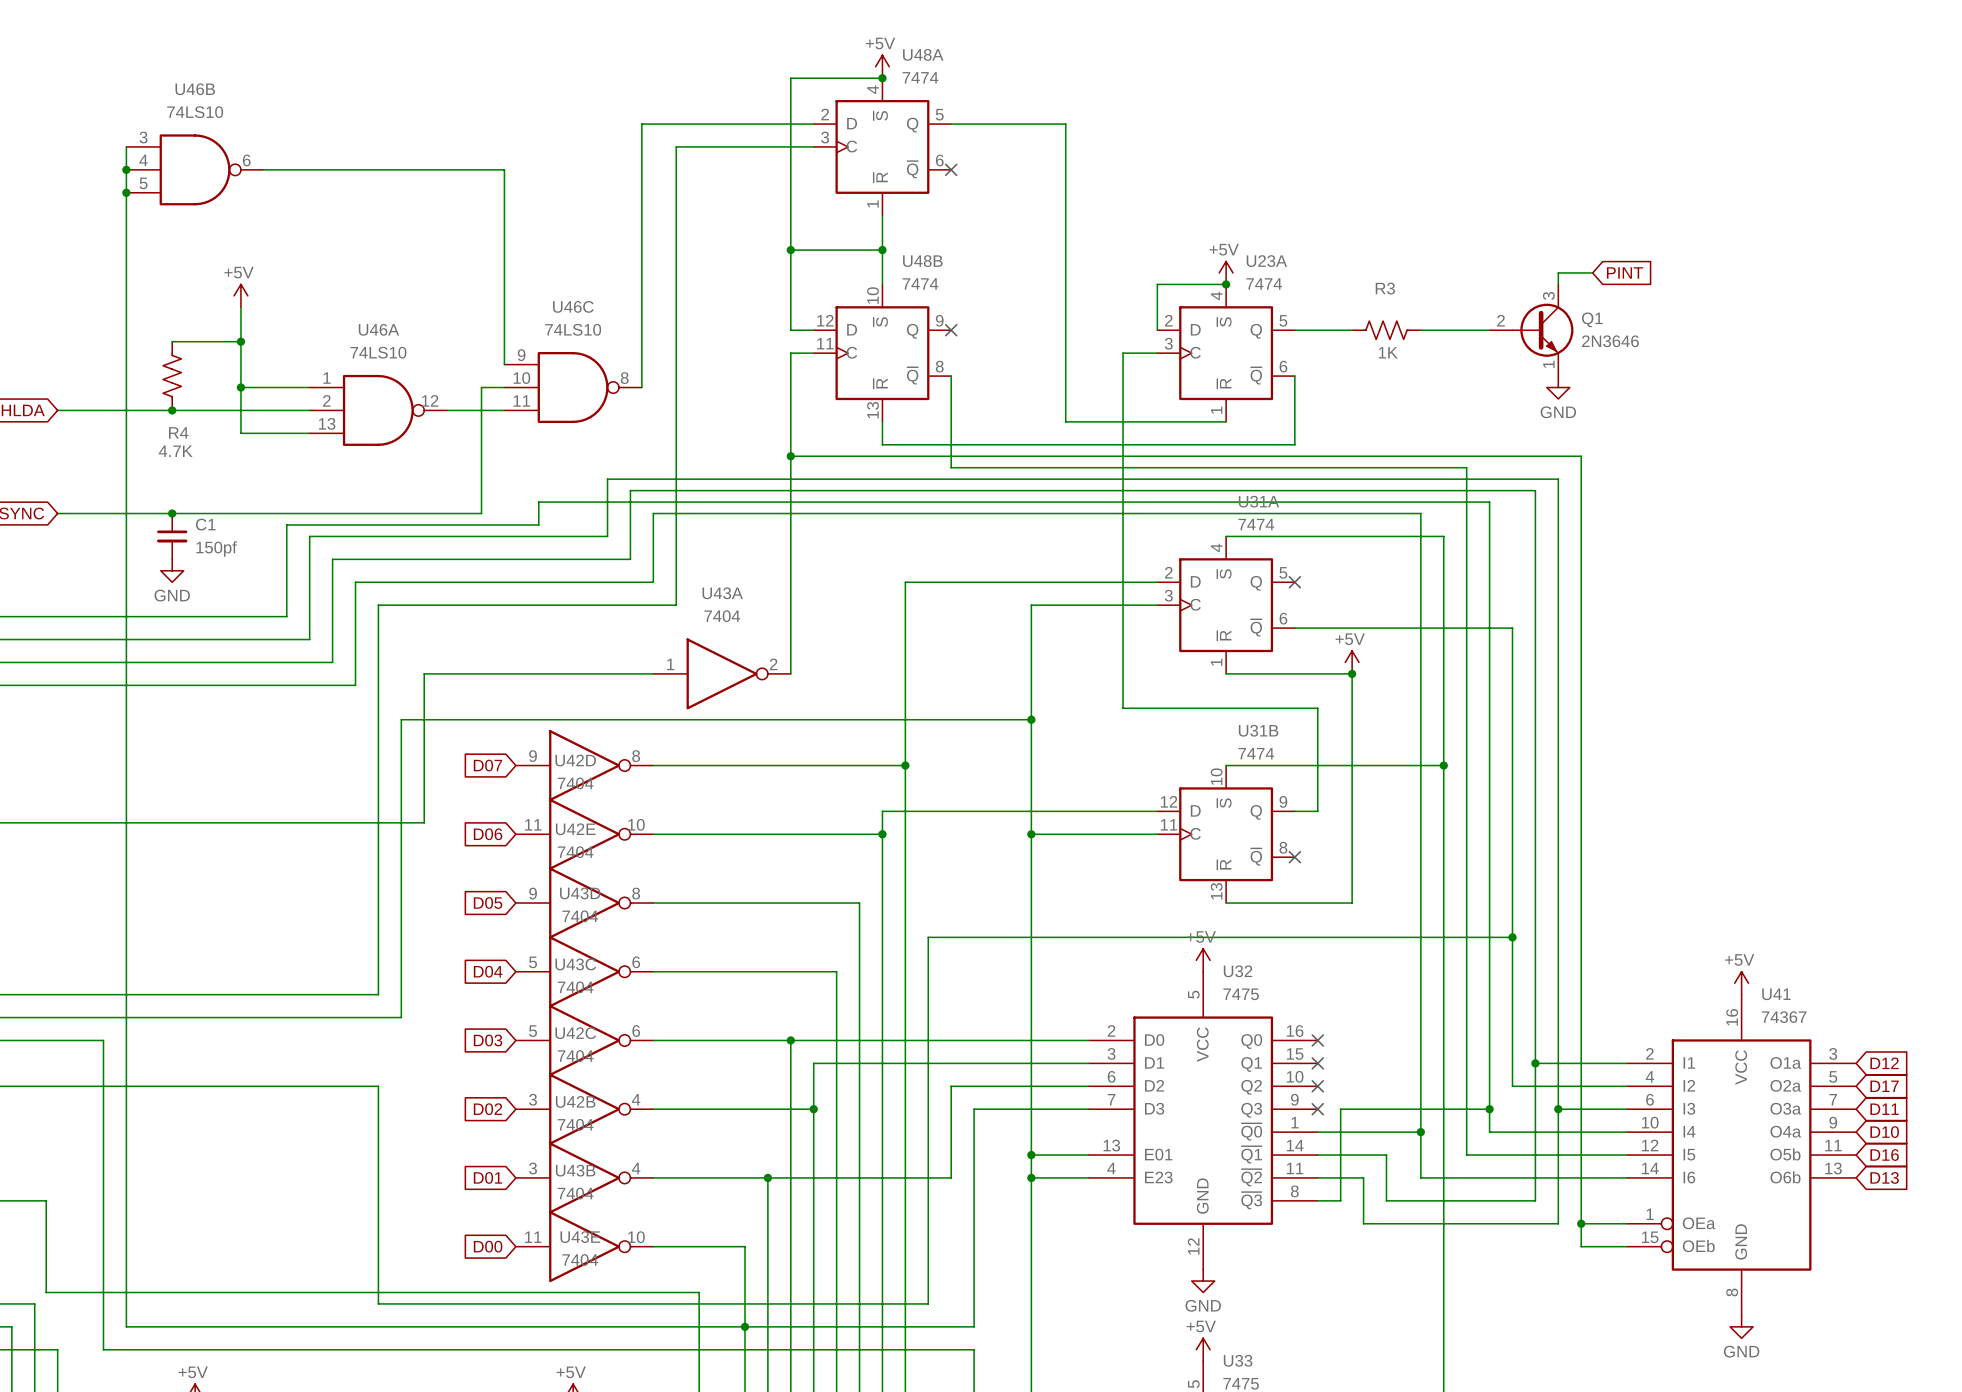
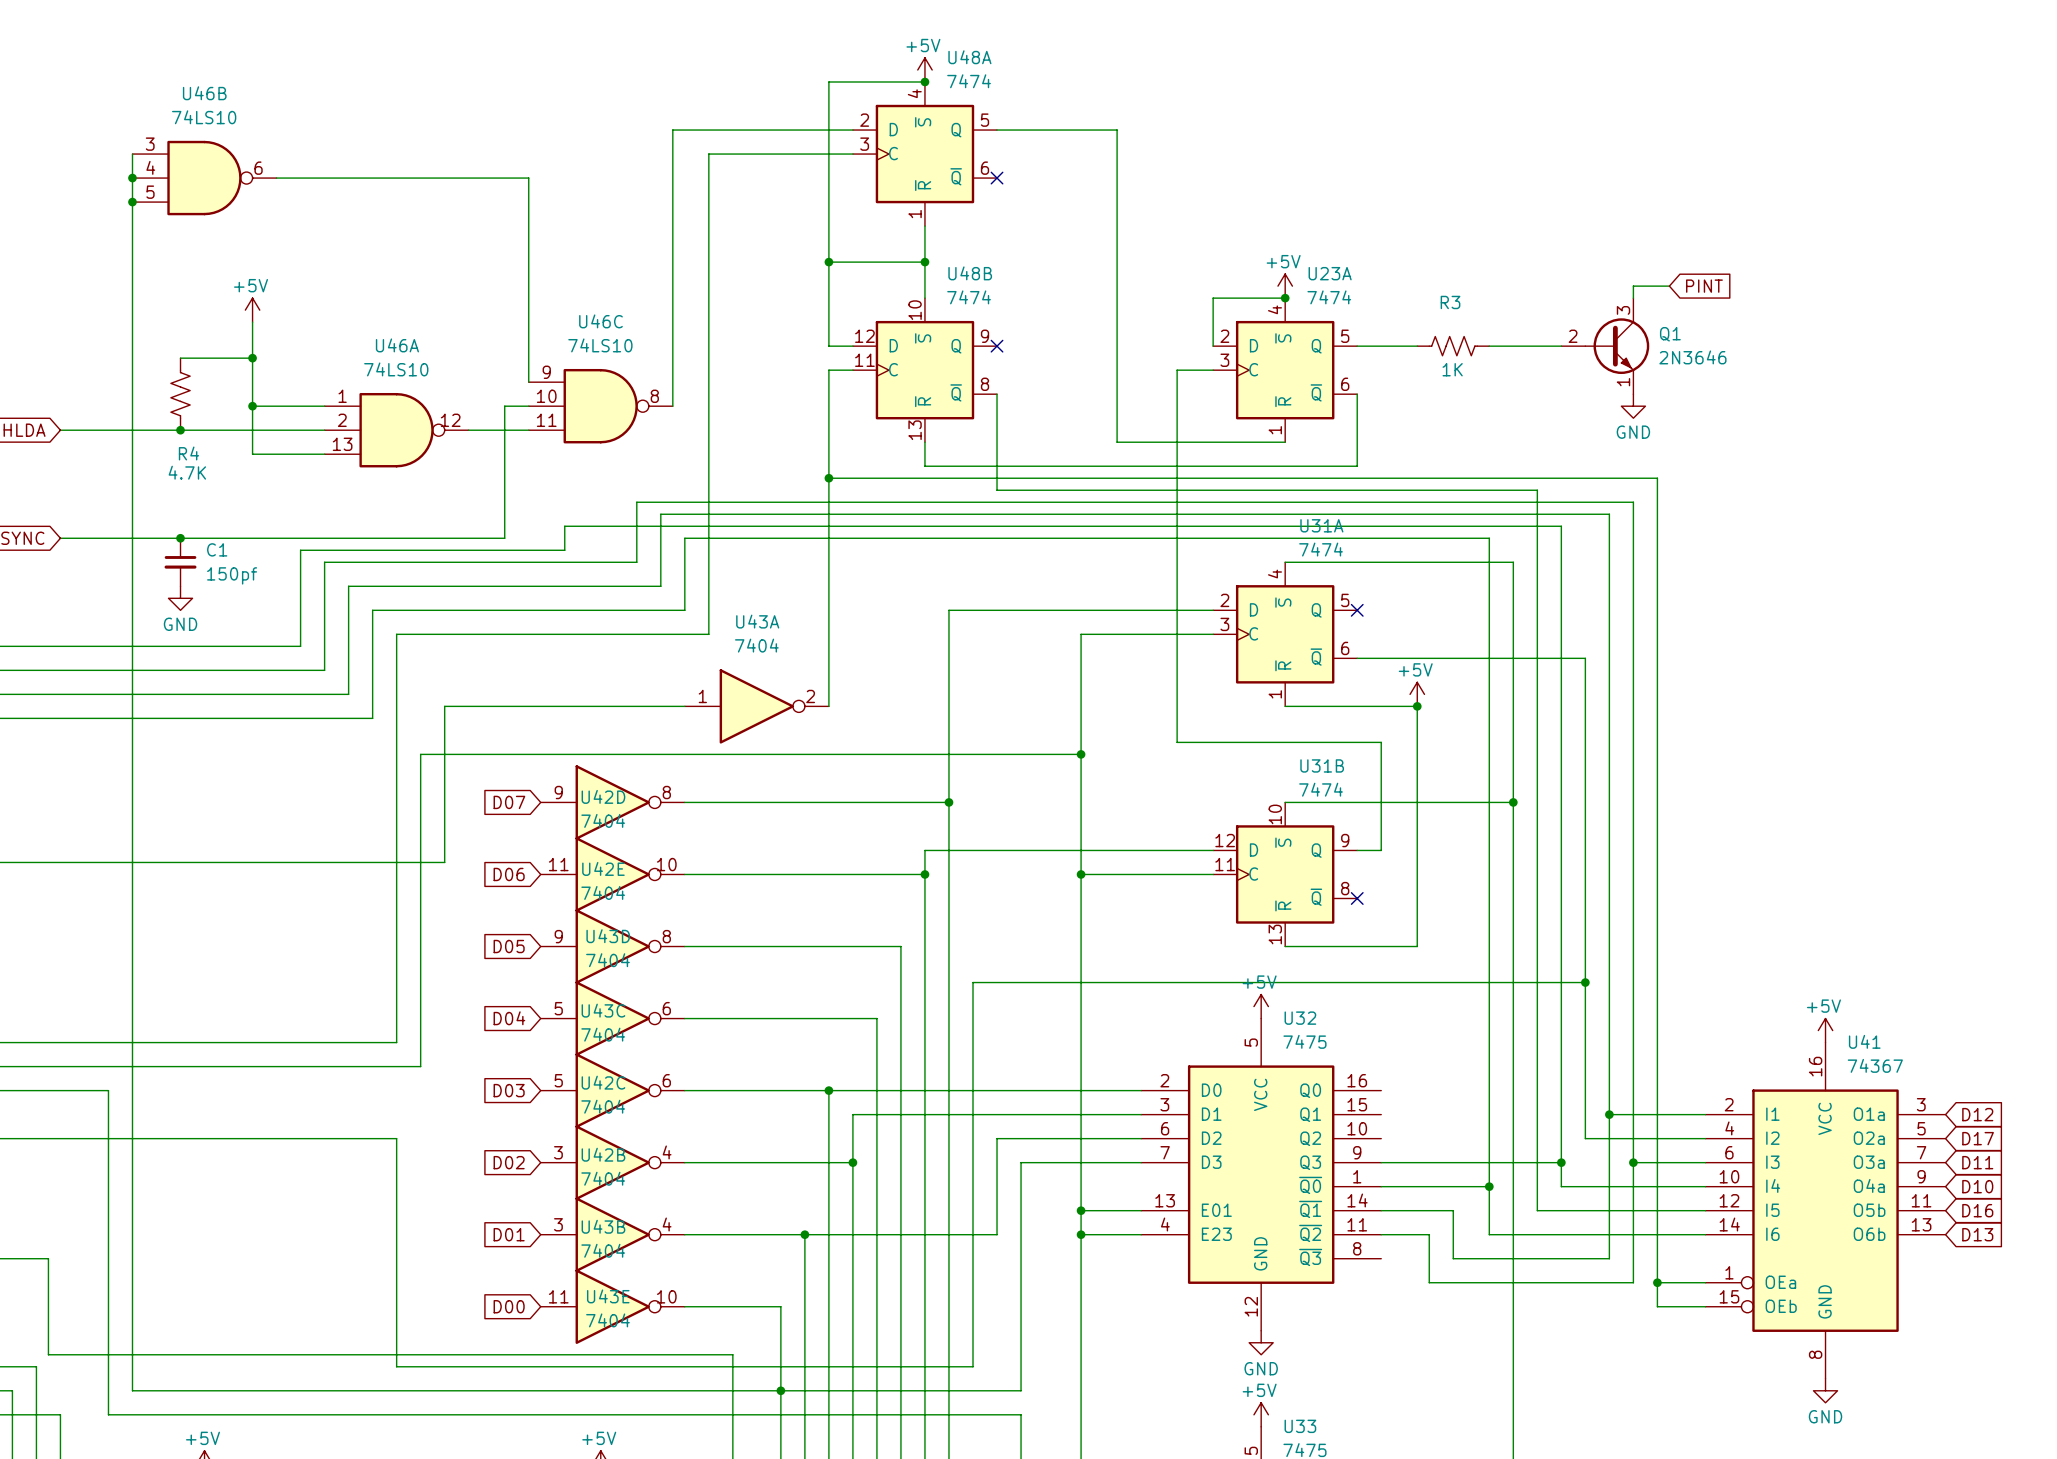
no-connect mark: (1317, 1040) -> none
no-connect mark: (1317, 1063) -> none
no-connect mark: (1317, 1086) -> none
no-connect mark: (1317, 1109) -> none
wire: (1340, 1109) (1340, 1200) (1317, 1200) -> (1405, 1162) (1381, 1162)

